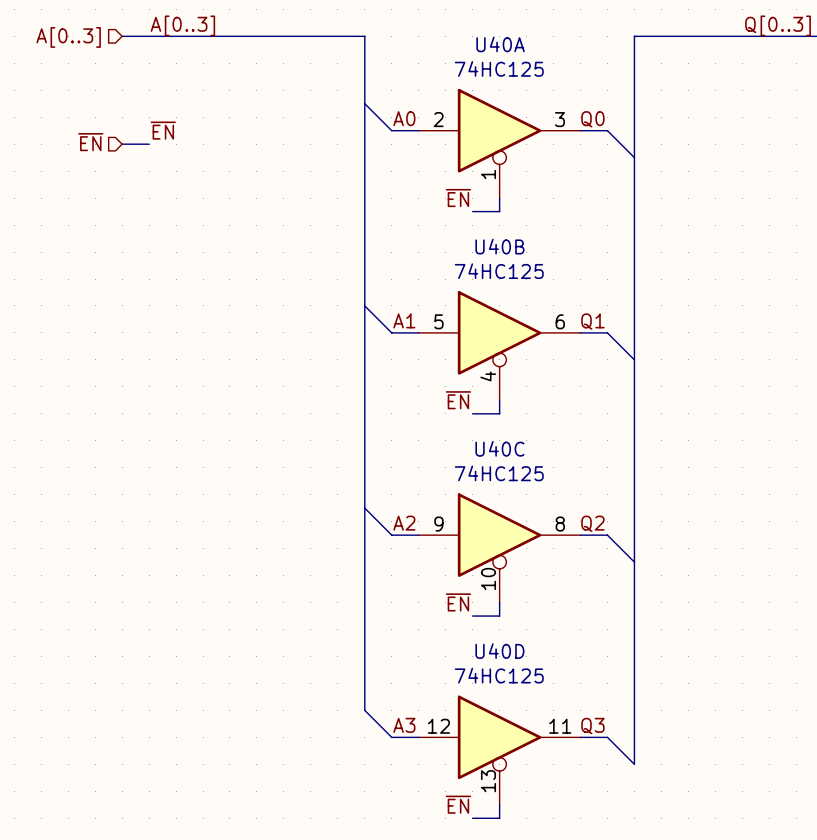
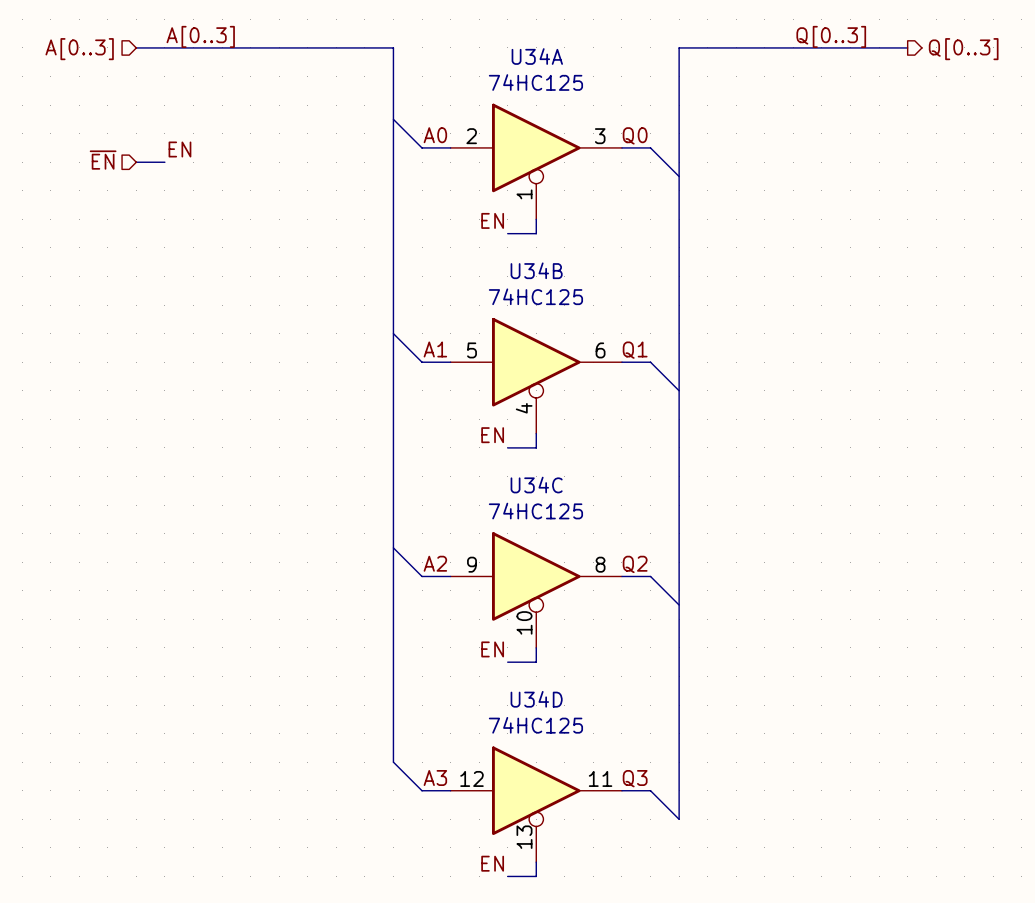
U40A name: U40A (500, 44) -> U34A (537, 56)
label: ~{EN} (163, 130) -> EN (179, 149)
label: ~{EN} (458, 198) -> EN (492, 220)
U40B name: U40B (499, 246) -> U34B (536, 270)
label: ~{EN} (458, 400) -> EN (492, 435)
U40C name: U40C (499, 448) -> U34C (536, 485)
label: ~{EN} (458, 602) -> EN (492, 649)
U40D name: U40D (499, 651) -> U34D (536, 699)
label: ~{EN} (458, 804) -> EN (492, 863)

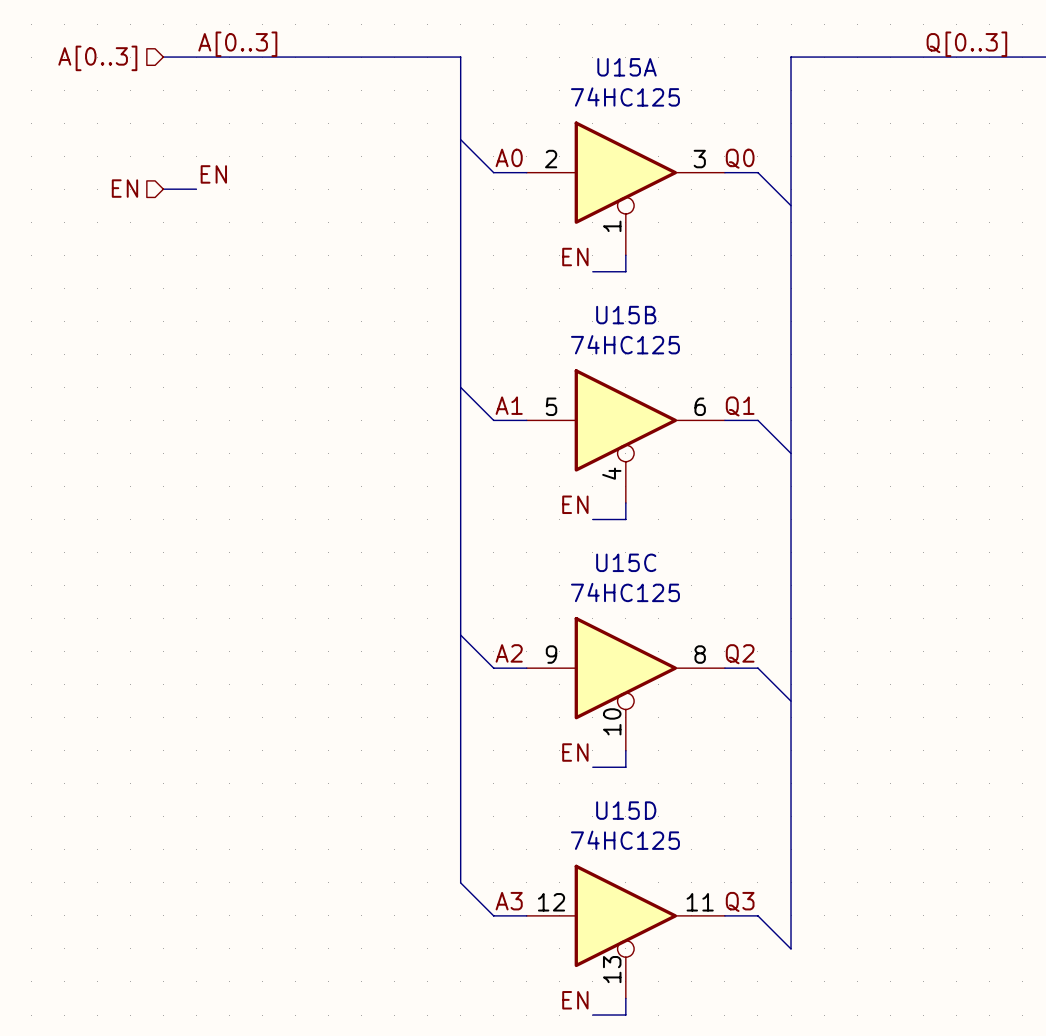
U34A name: U34A (537, 56) -> U15A (627, 67)
hierarchical label: ~{EN} (103, 160) -> EN (124, 188)
U34B name: U34B (536, 270) -> U15B (626, 315)
U34C name: U34C (536, 485) -> U15C (626, 562)
U34D name: U34D (536, 699) -> U15D (626, 810)

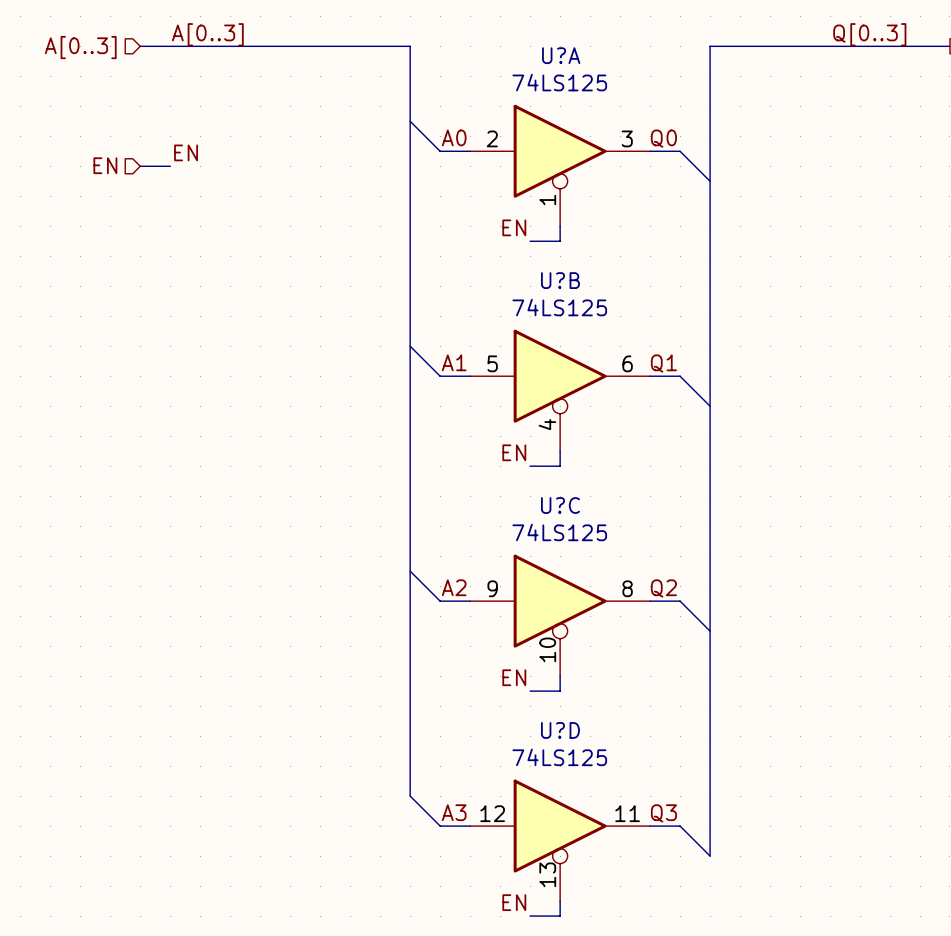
U15A name: U15A (627, 67) -> U?A (561, 55)
U15A value: 74HC125 (625, 96) -> 74LS125 (559, 82)
U15B name: U15B (626, 315) -> U?B (560, 280)
U15B value: 74HC125 (625, 344) -> 74LS125 (559, 307)
U15C name: U15C (626, 562) -> U?C (560, 505)
U15C value: 74HC125 (625, 592) -> 74LS125 (559, 532)
U15D name: U15D (626, 810) -> U?D (560, 730)
U15D value: 74HC125 (625, 840) -> 74LS125 (559, 757)

